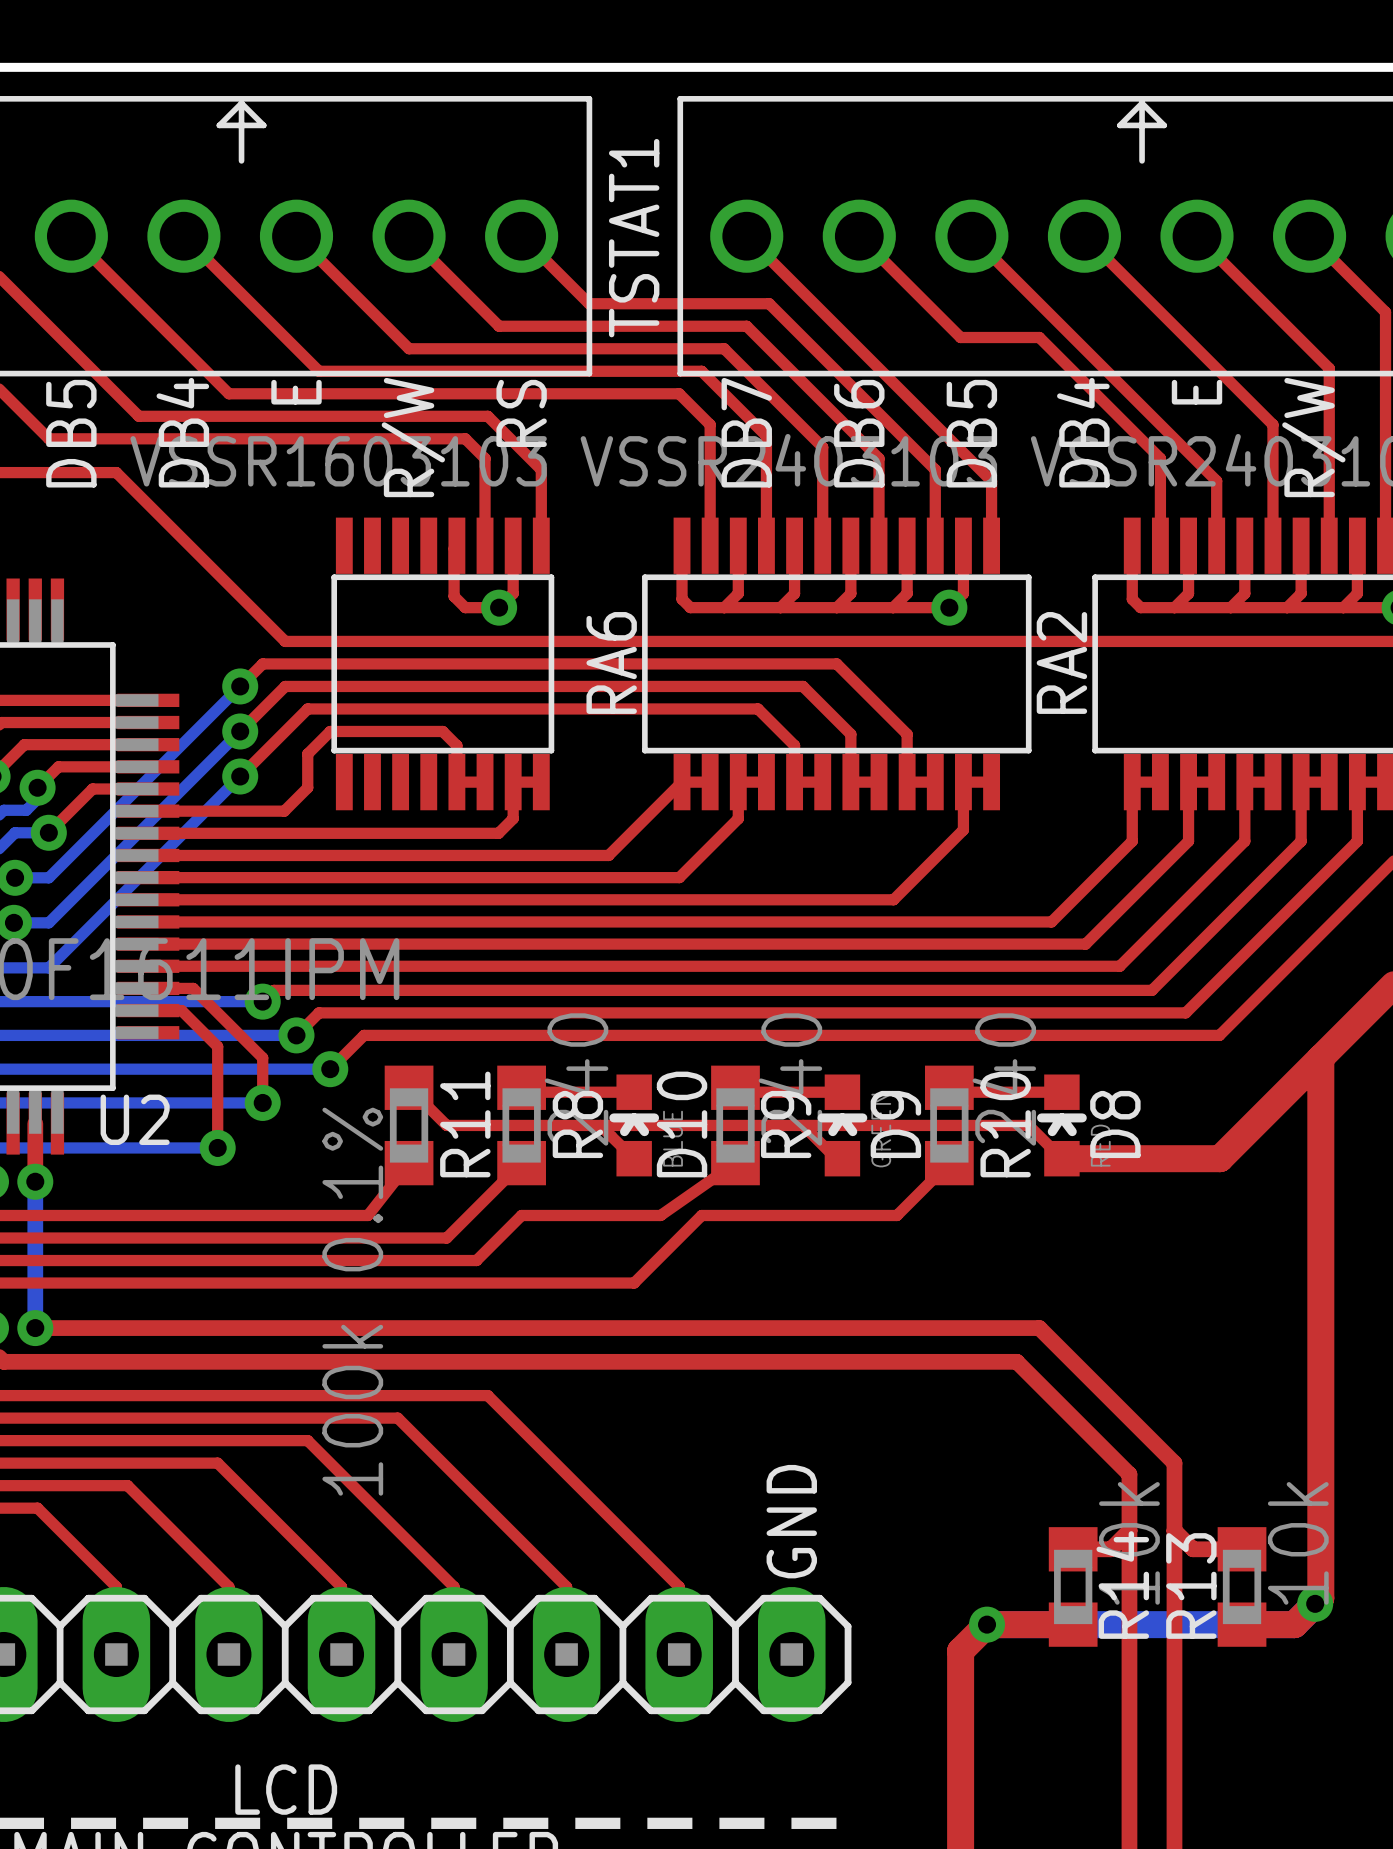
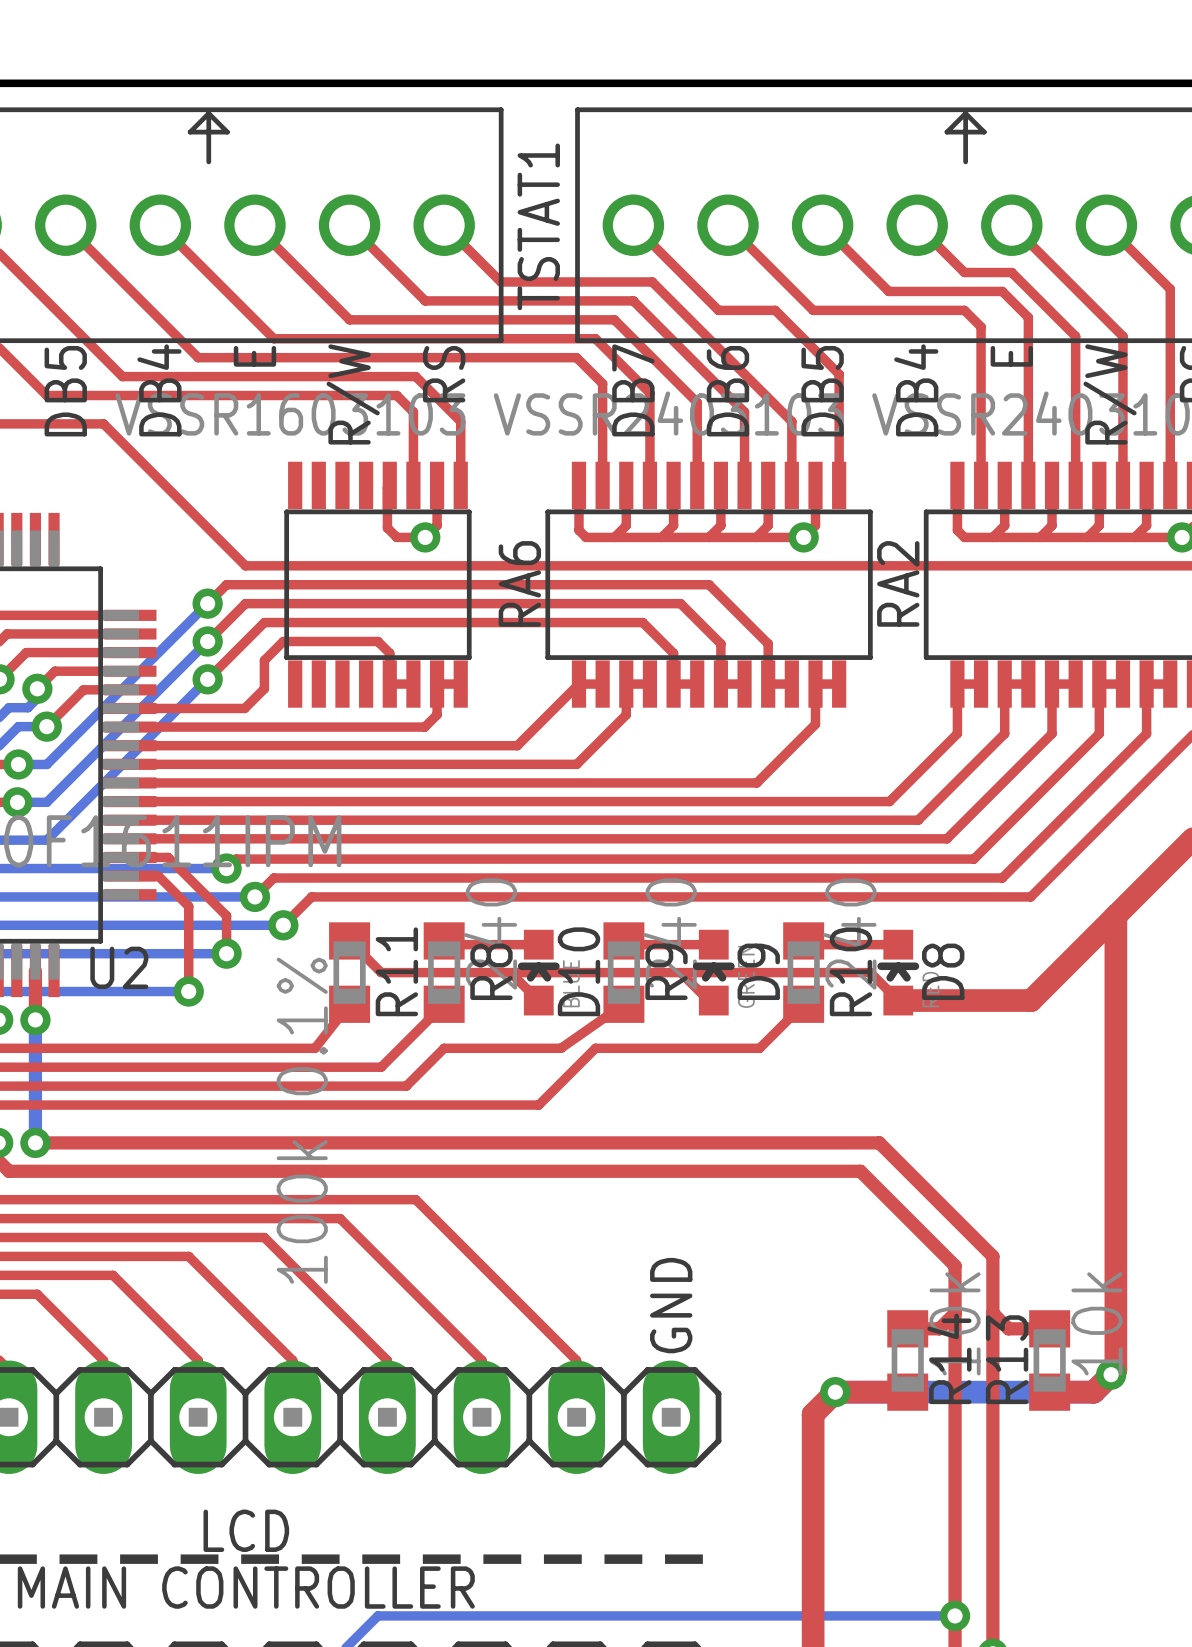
top track: (1140, 292) (1272, 424) -> (964, 272) (1011, 272) (1075, 336) (1075, 383)
top track: (1050, 314) (1216, 481) -> (888, 291) (1002, 291) (1028, 317) (1028, 430)
top track: (848, 337) (991, 481) -> (718, 310) (775, 310) (839, 374) (839, 430)
top track: (1039, 337) (1160, 458) -> (879, 310) (964, 310) (981, 326) (981, 412)

